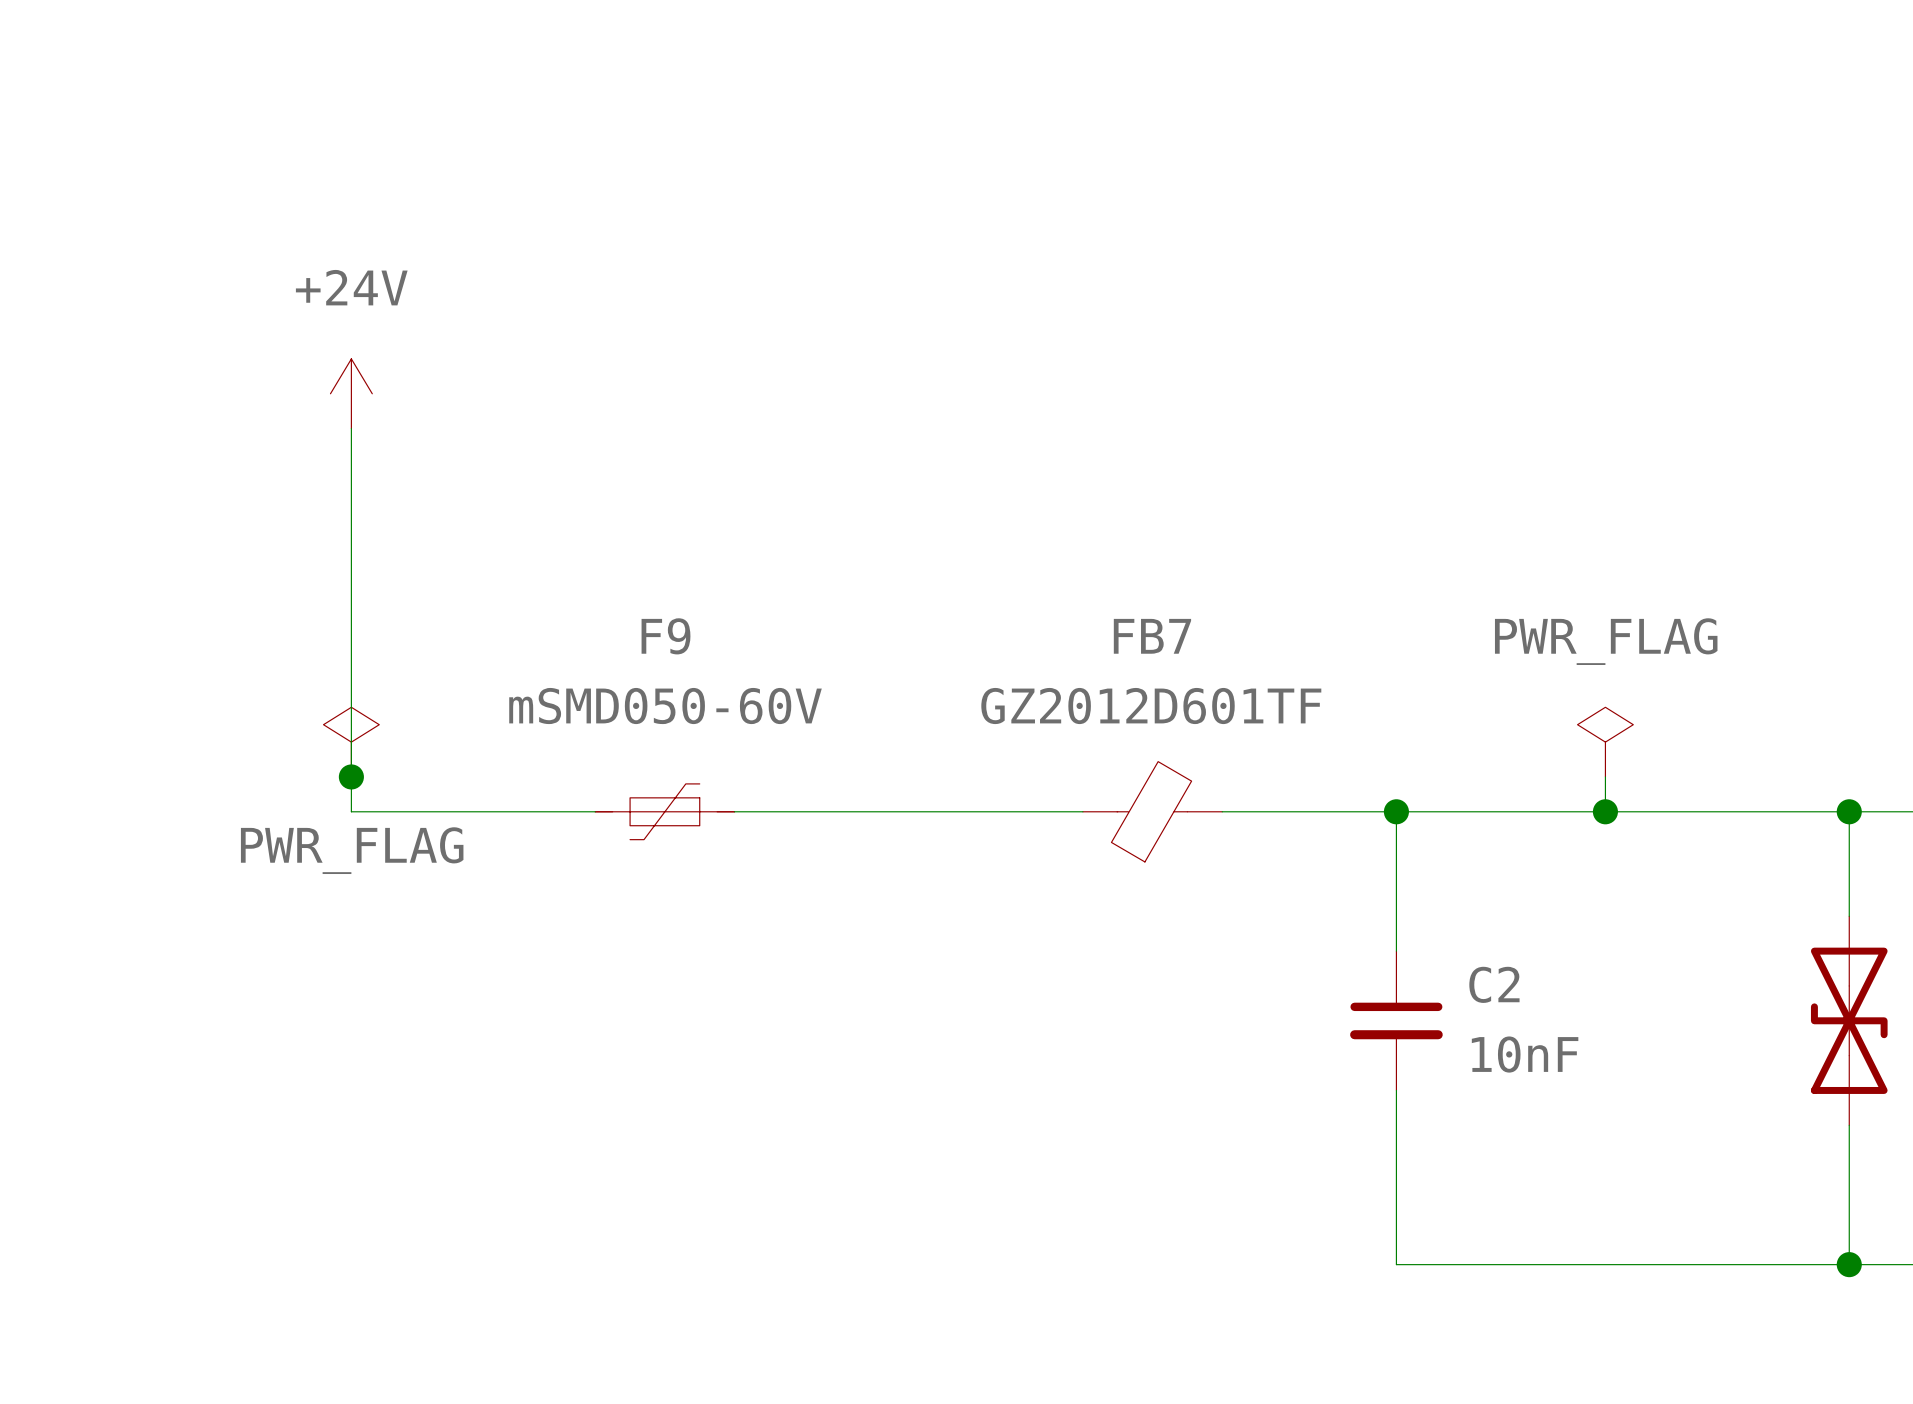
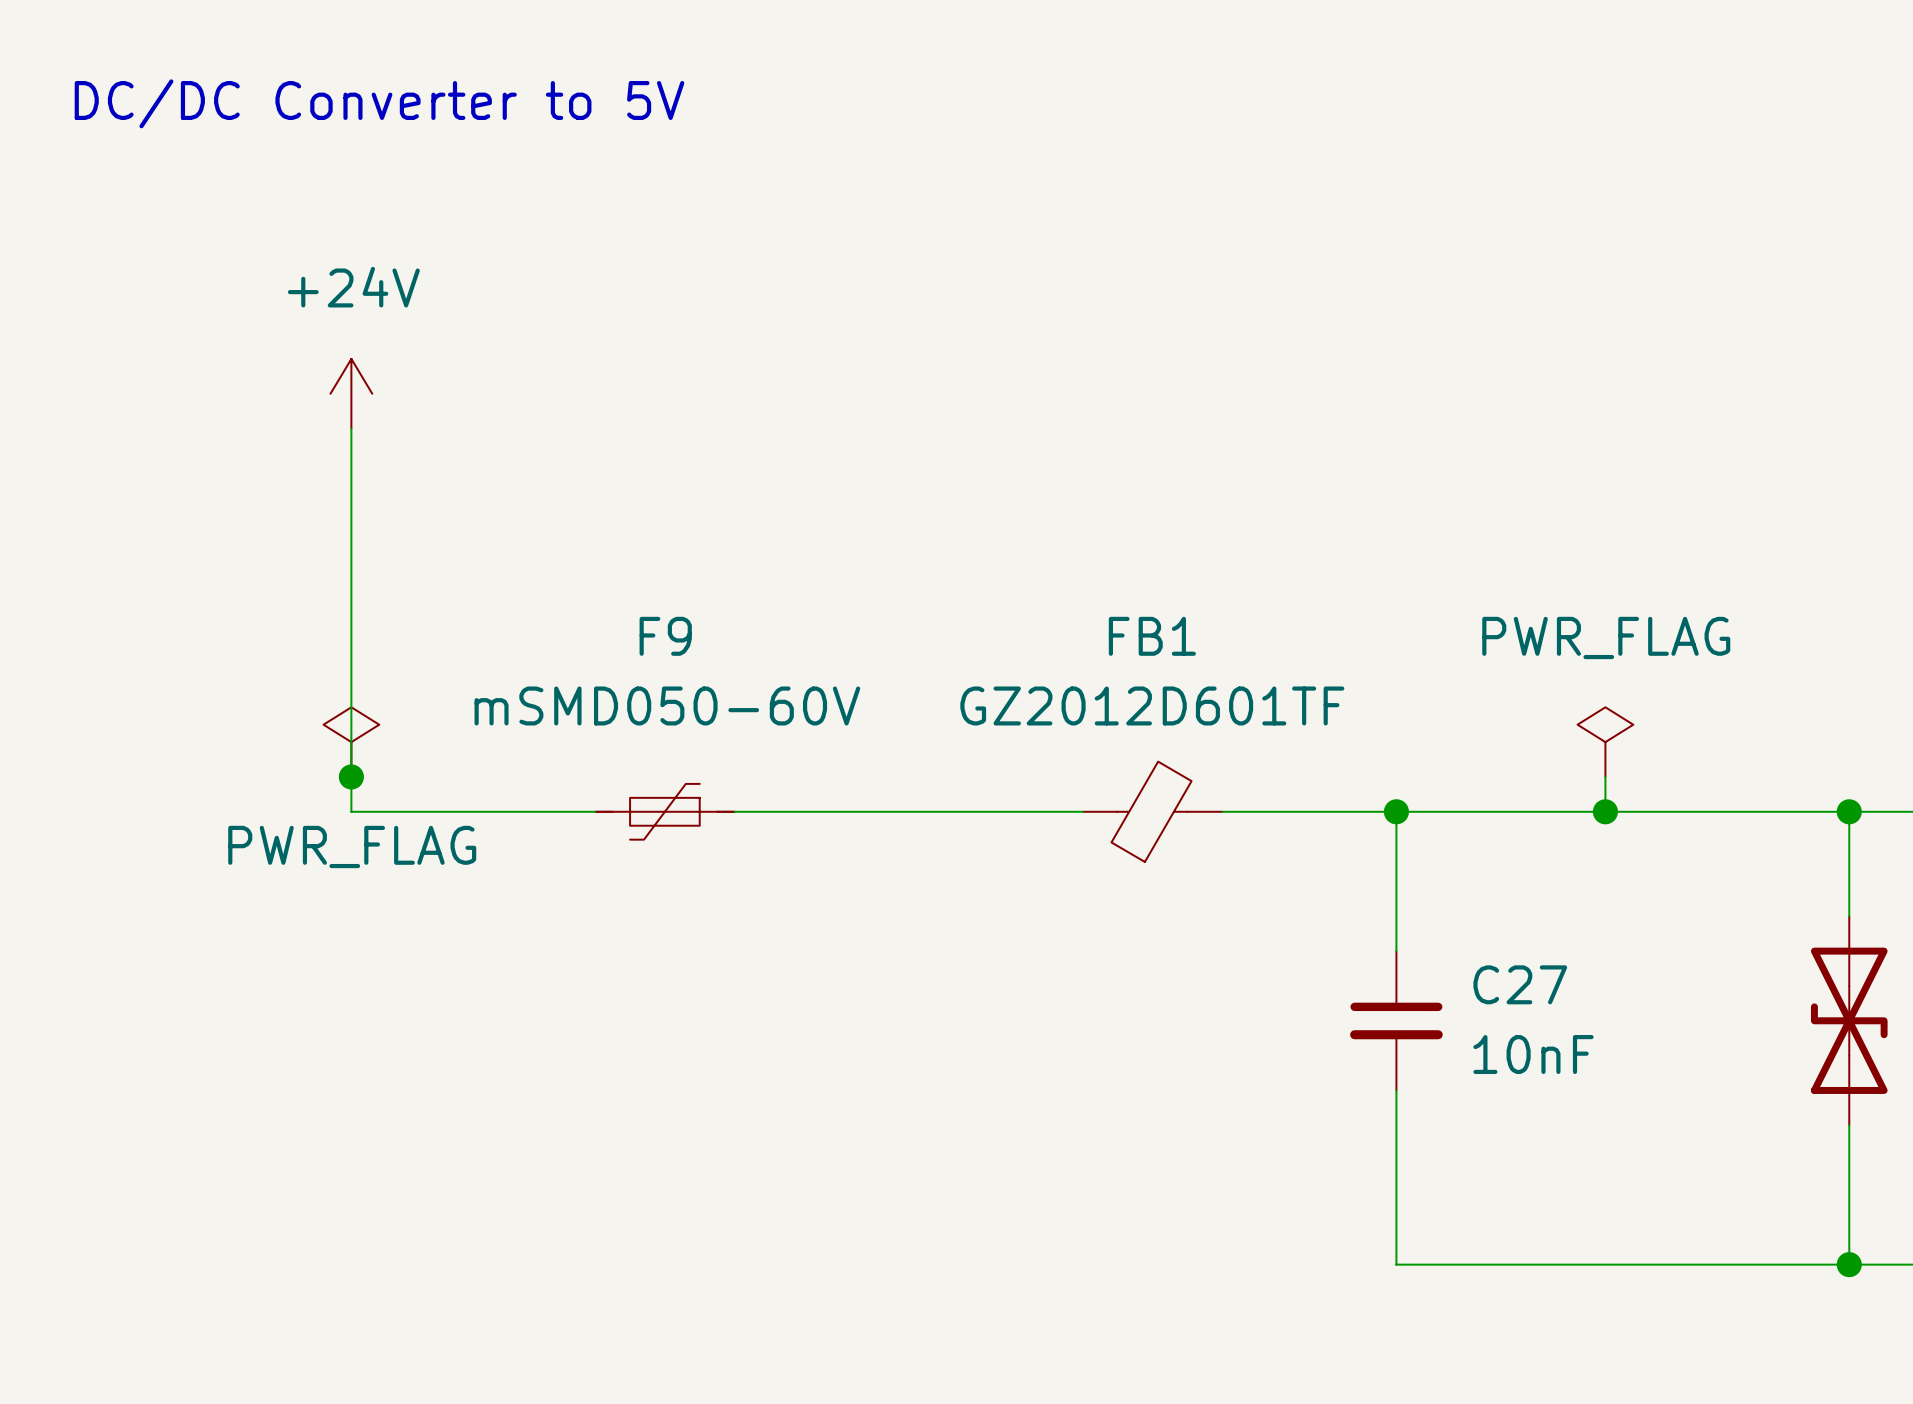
text: none -> DC/DC Converter to 5V (379, 103)
FB7 name: FB7 (1152, 636) -> FB1 (1152, 636)
C2 name: C2 (1494, 984) -> C27 (1520, 984)

